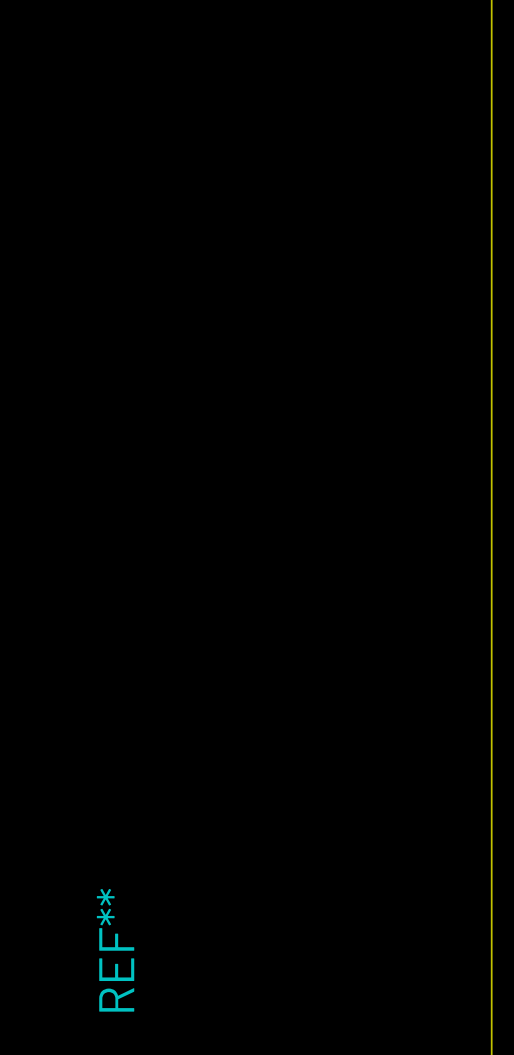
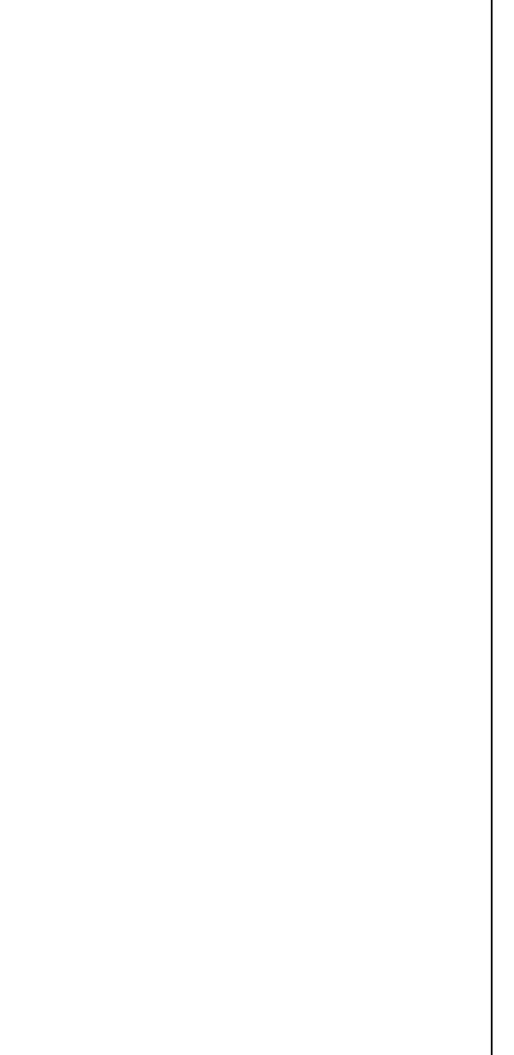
REF**: (115, 950) -> none

